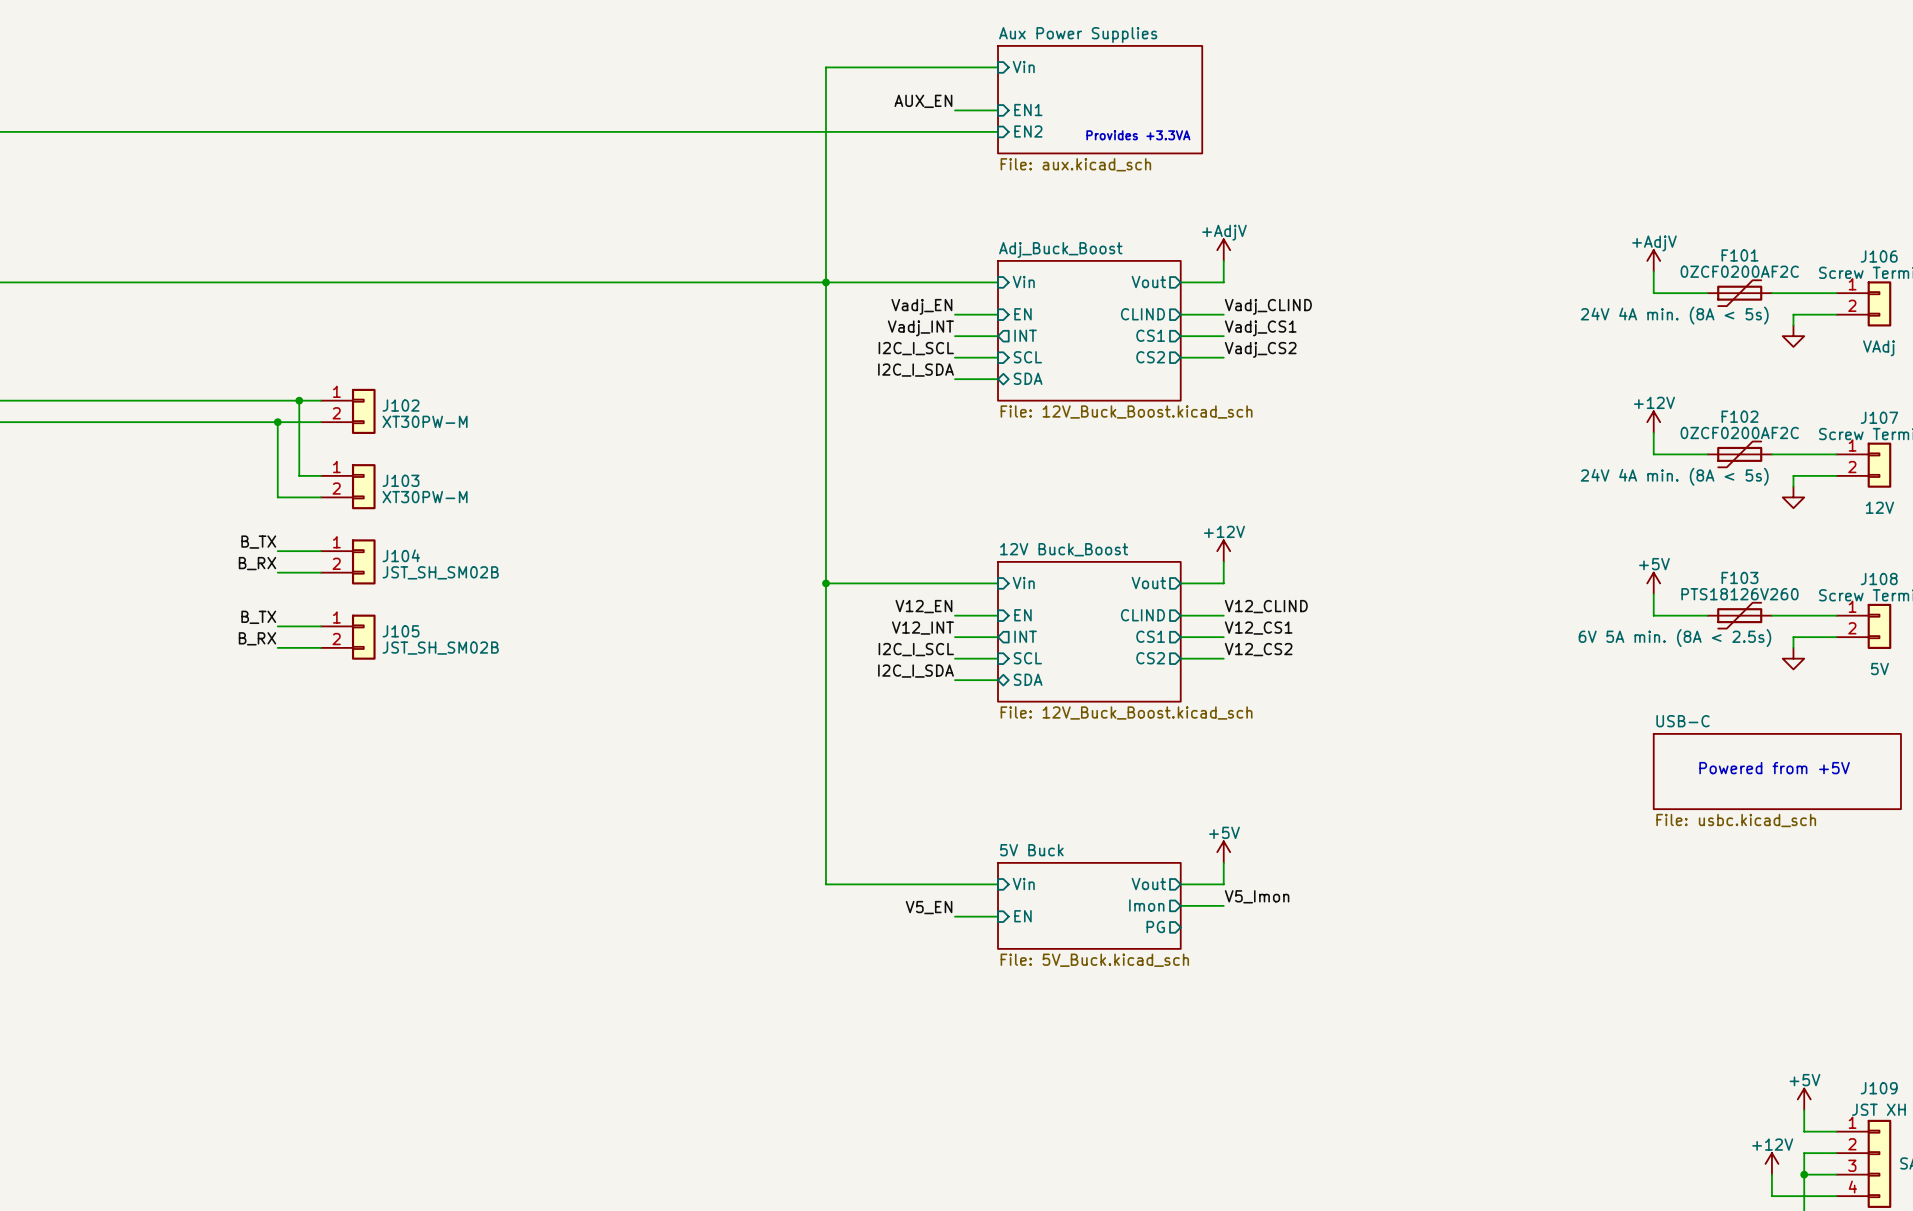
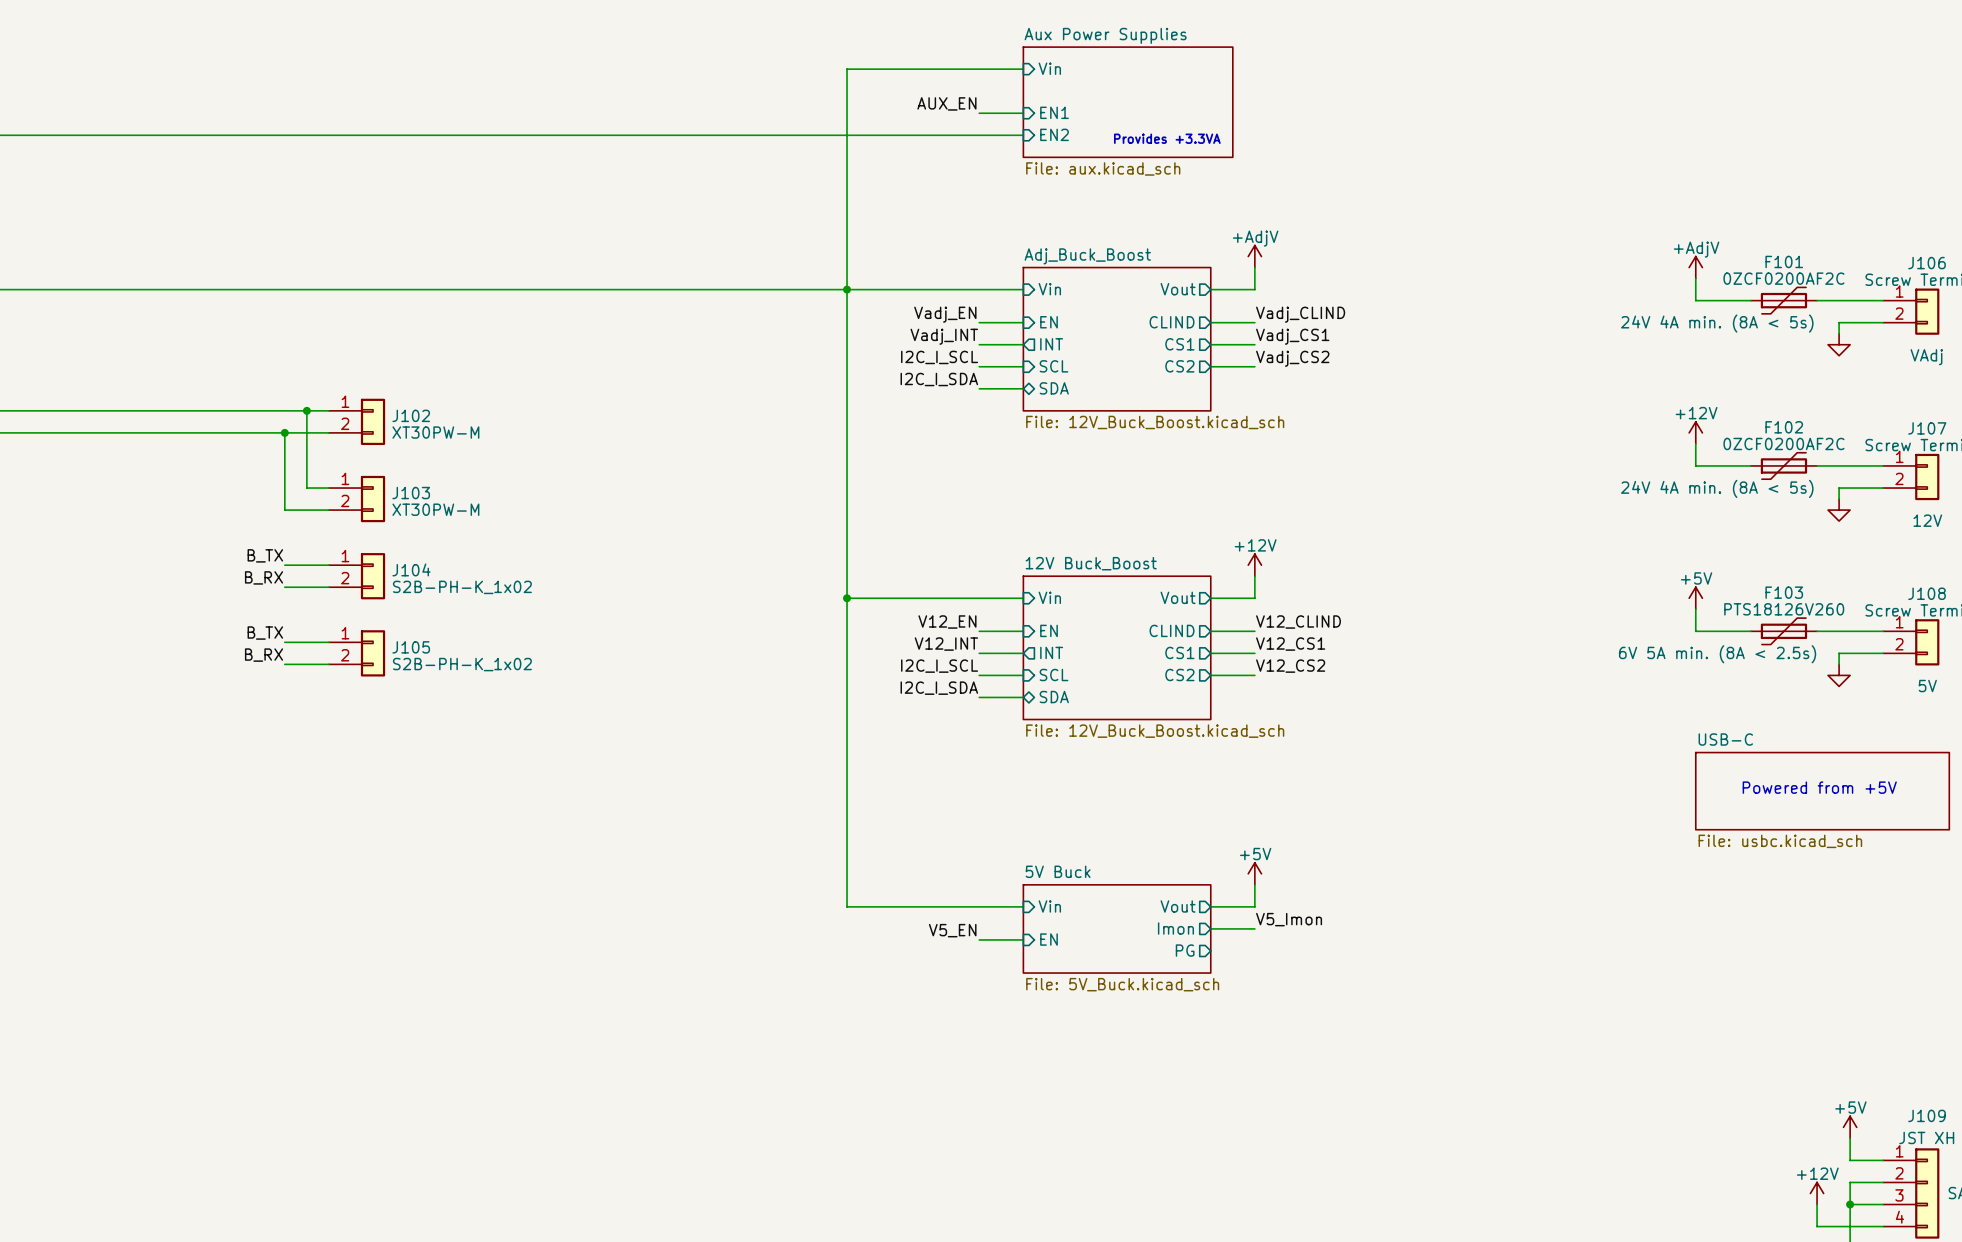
J104 value: JST_SH_SM02B (440, 572) -> S2B-PH-K_1x02 (462, 587)
J105 value: JST_SH_SM02B (440, 648) -> S2B-PH-K_1x02 (462, 664)

